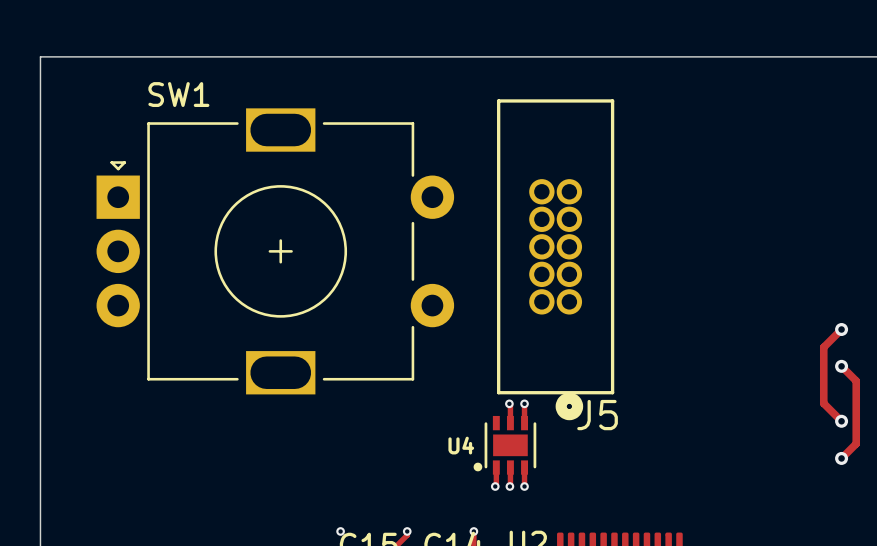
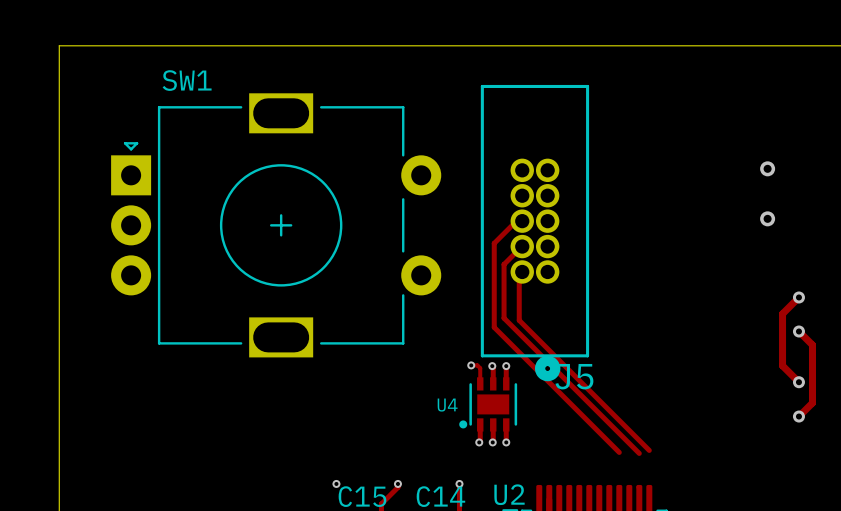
via: none -> (767, 168)
via: none -> (767, 218)
track: none -> (522, 221) (516, 221) (494, 243) (494, 327) (619, 452)
track: none -> (521, 246) (504, 264) (504, 318) (639, 453)
track: none -> (522, 271) (519, 274) (519, 320) (649, 450)
track: none -> (471, 365) (477, 365) (480, 368) (480, 383)
via: none -> (471, 365)

